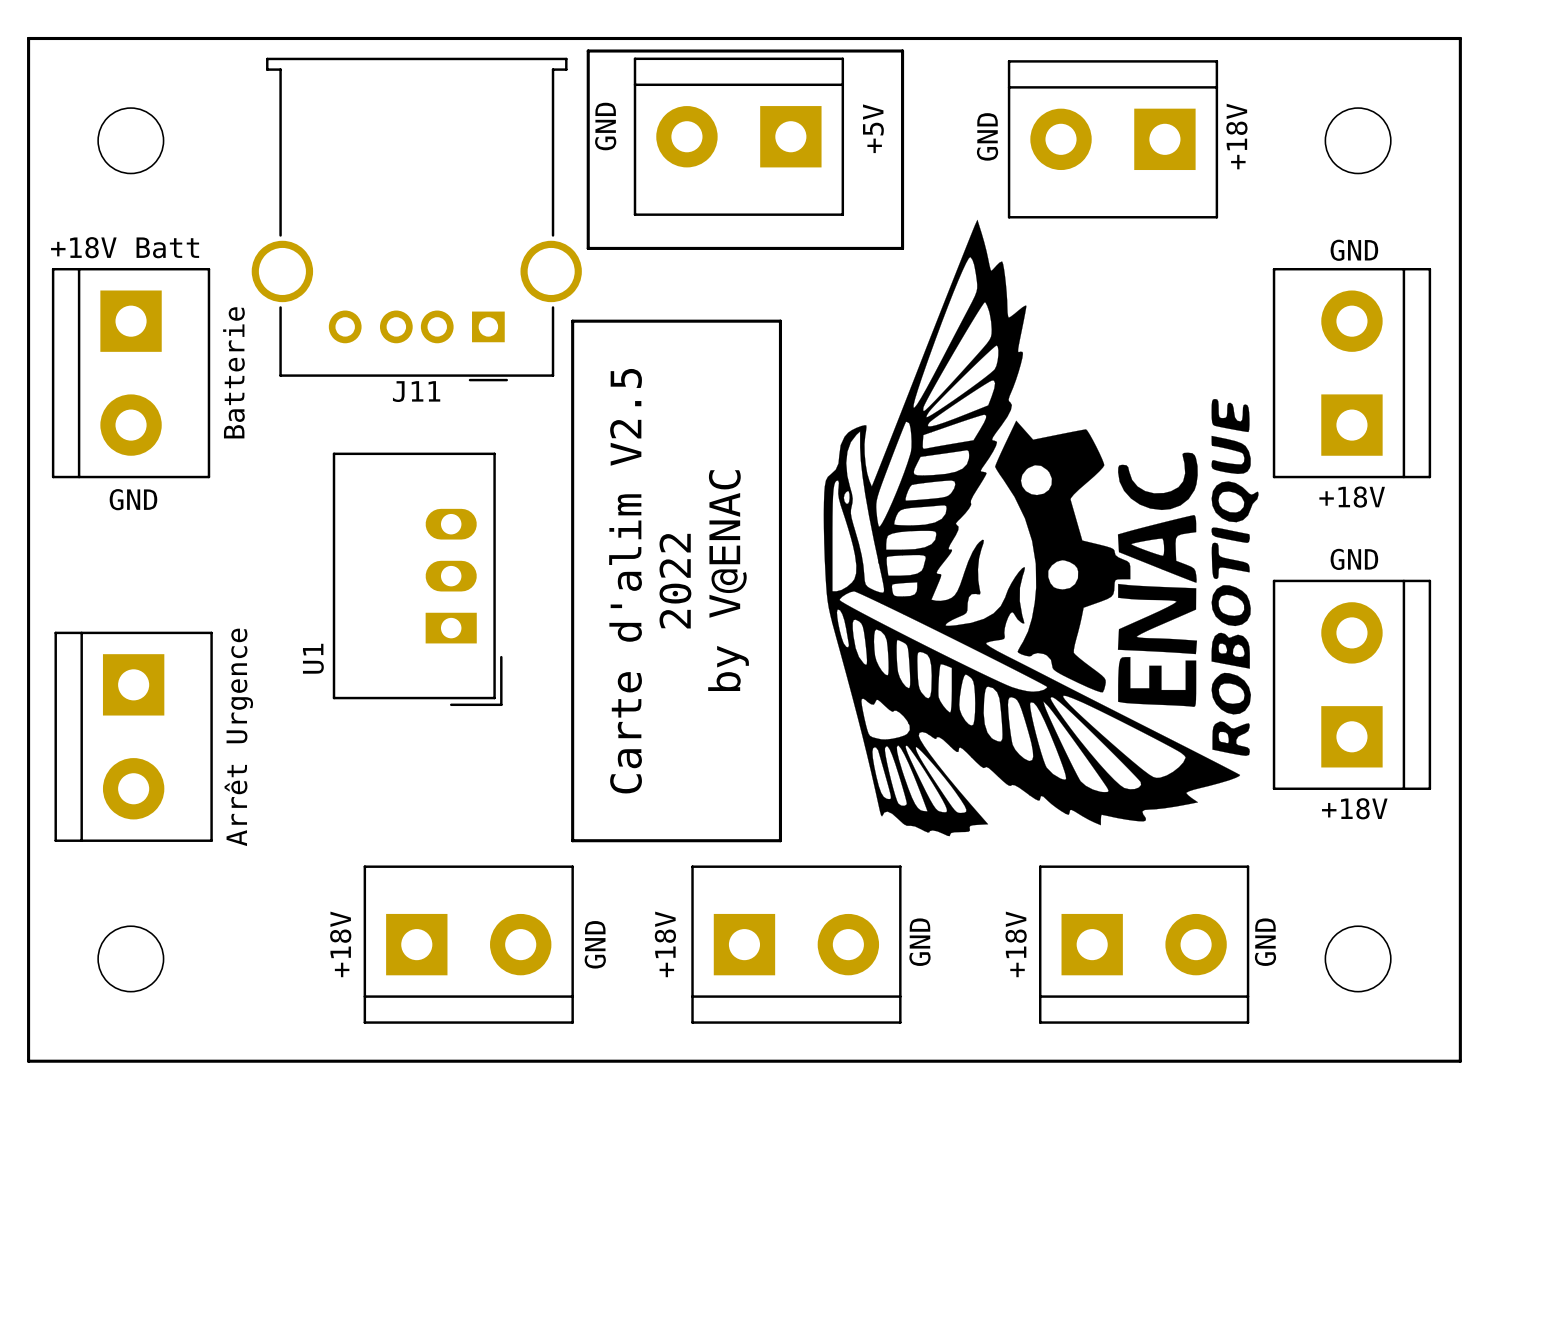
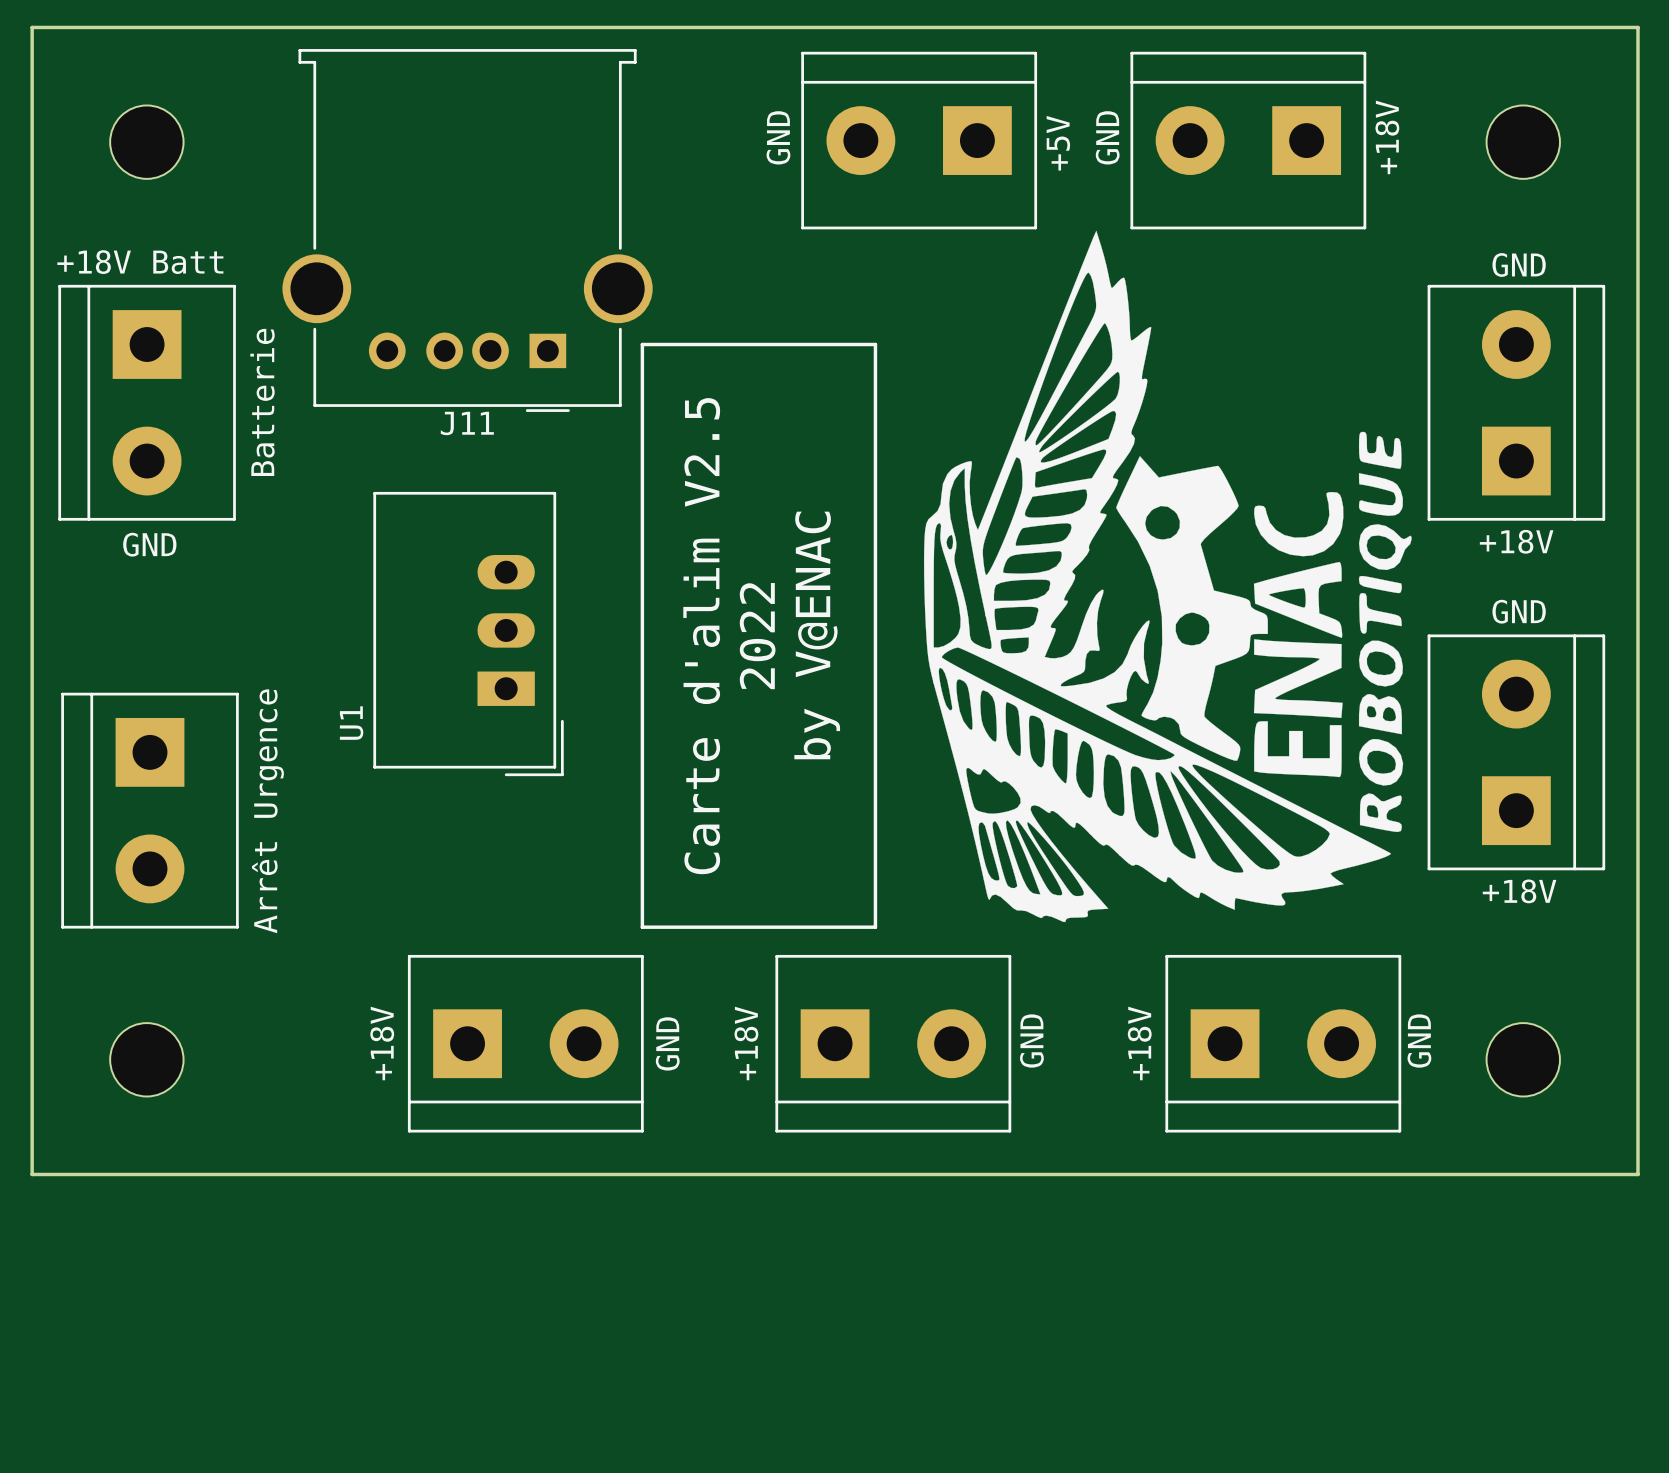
line: (588, 51) (902, 51) (902, 248) (588, 248) (588, 51) -> none
text position: GND (605, 126) -> GND (778, 137)
text position: +5V (873, 128) -> +5V (1058, 143)
part position: (738, 136) -> (919, 140)

